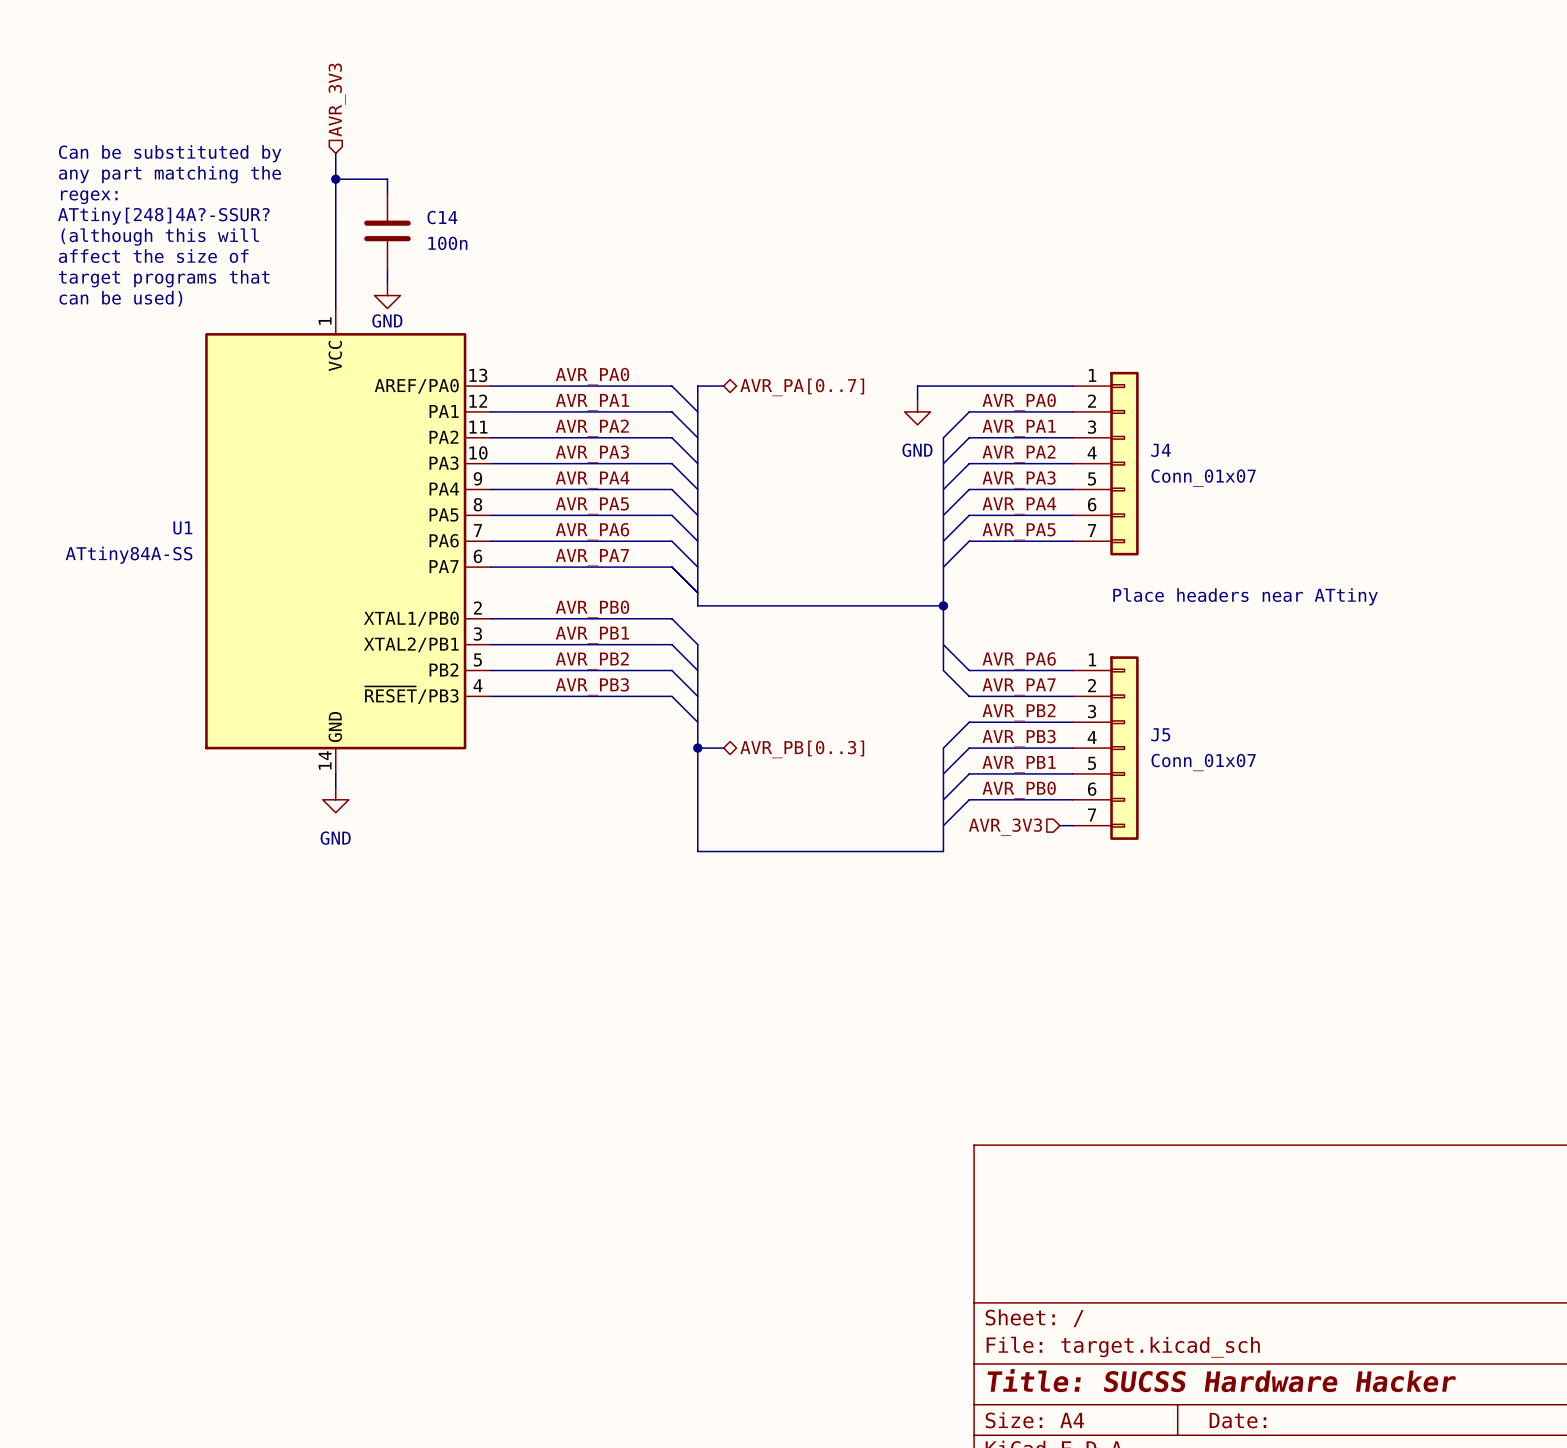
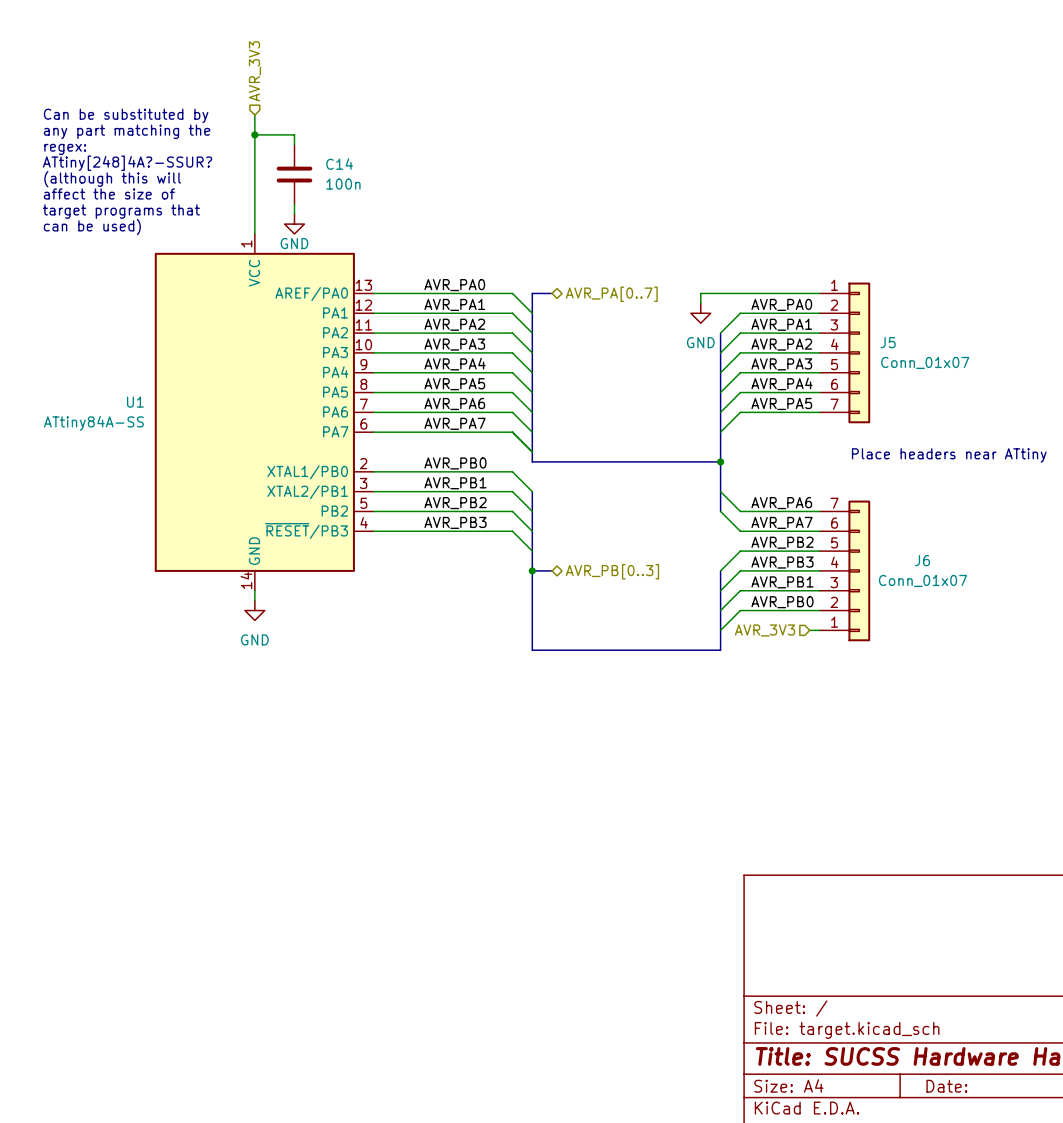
J4 name: J4 (1161, 450) -> J5 (888, 342)
J5 name: J5 (1160, 734) -> J6 (922, 560)
J5 flip: as is (1124, 748) -> up-down (859, 570)

